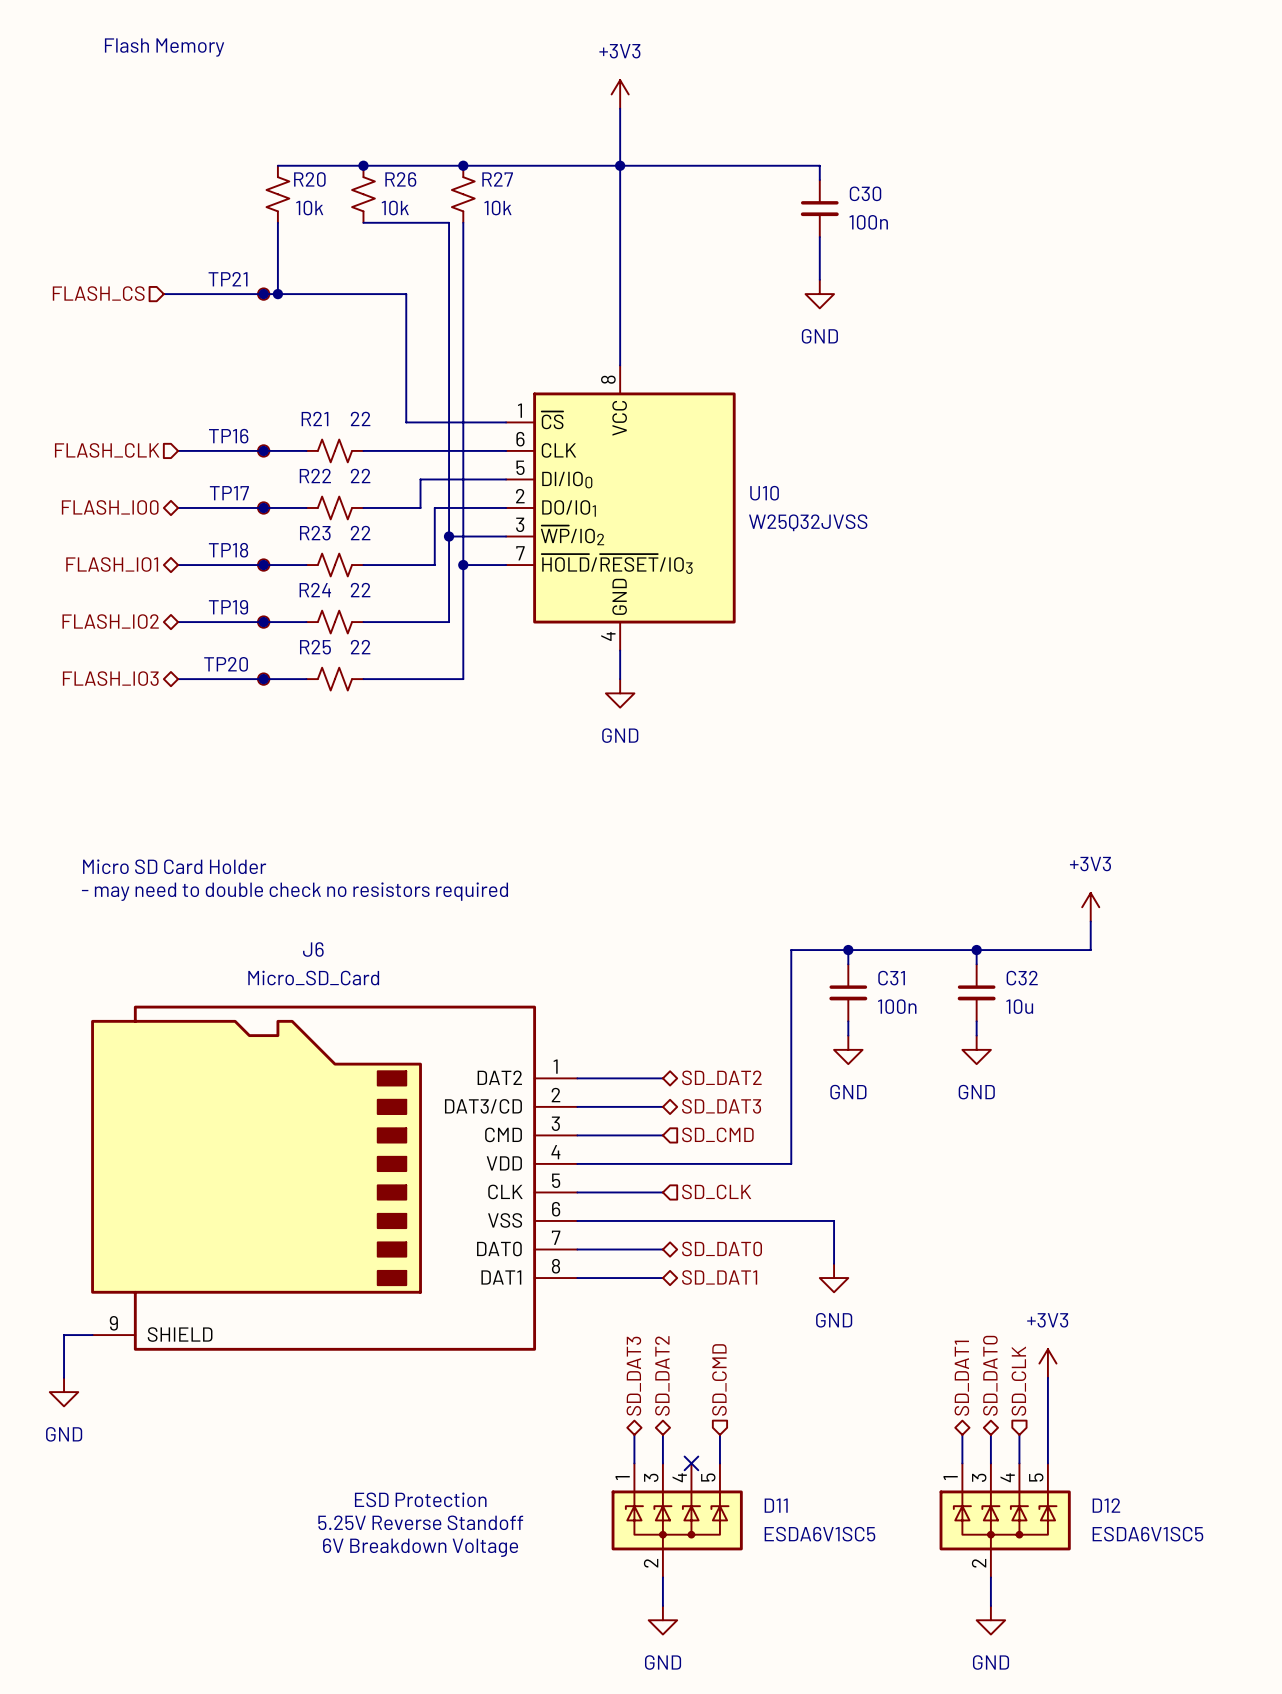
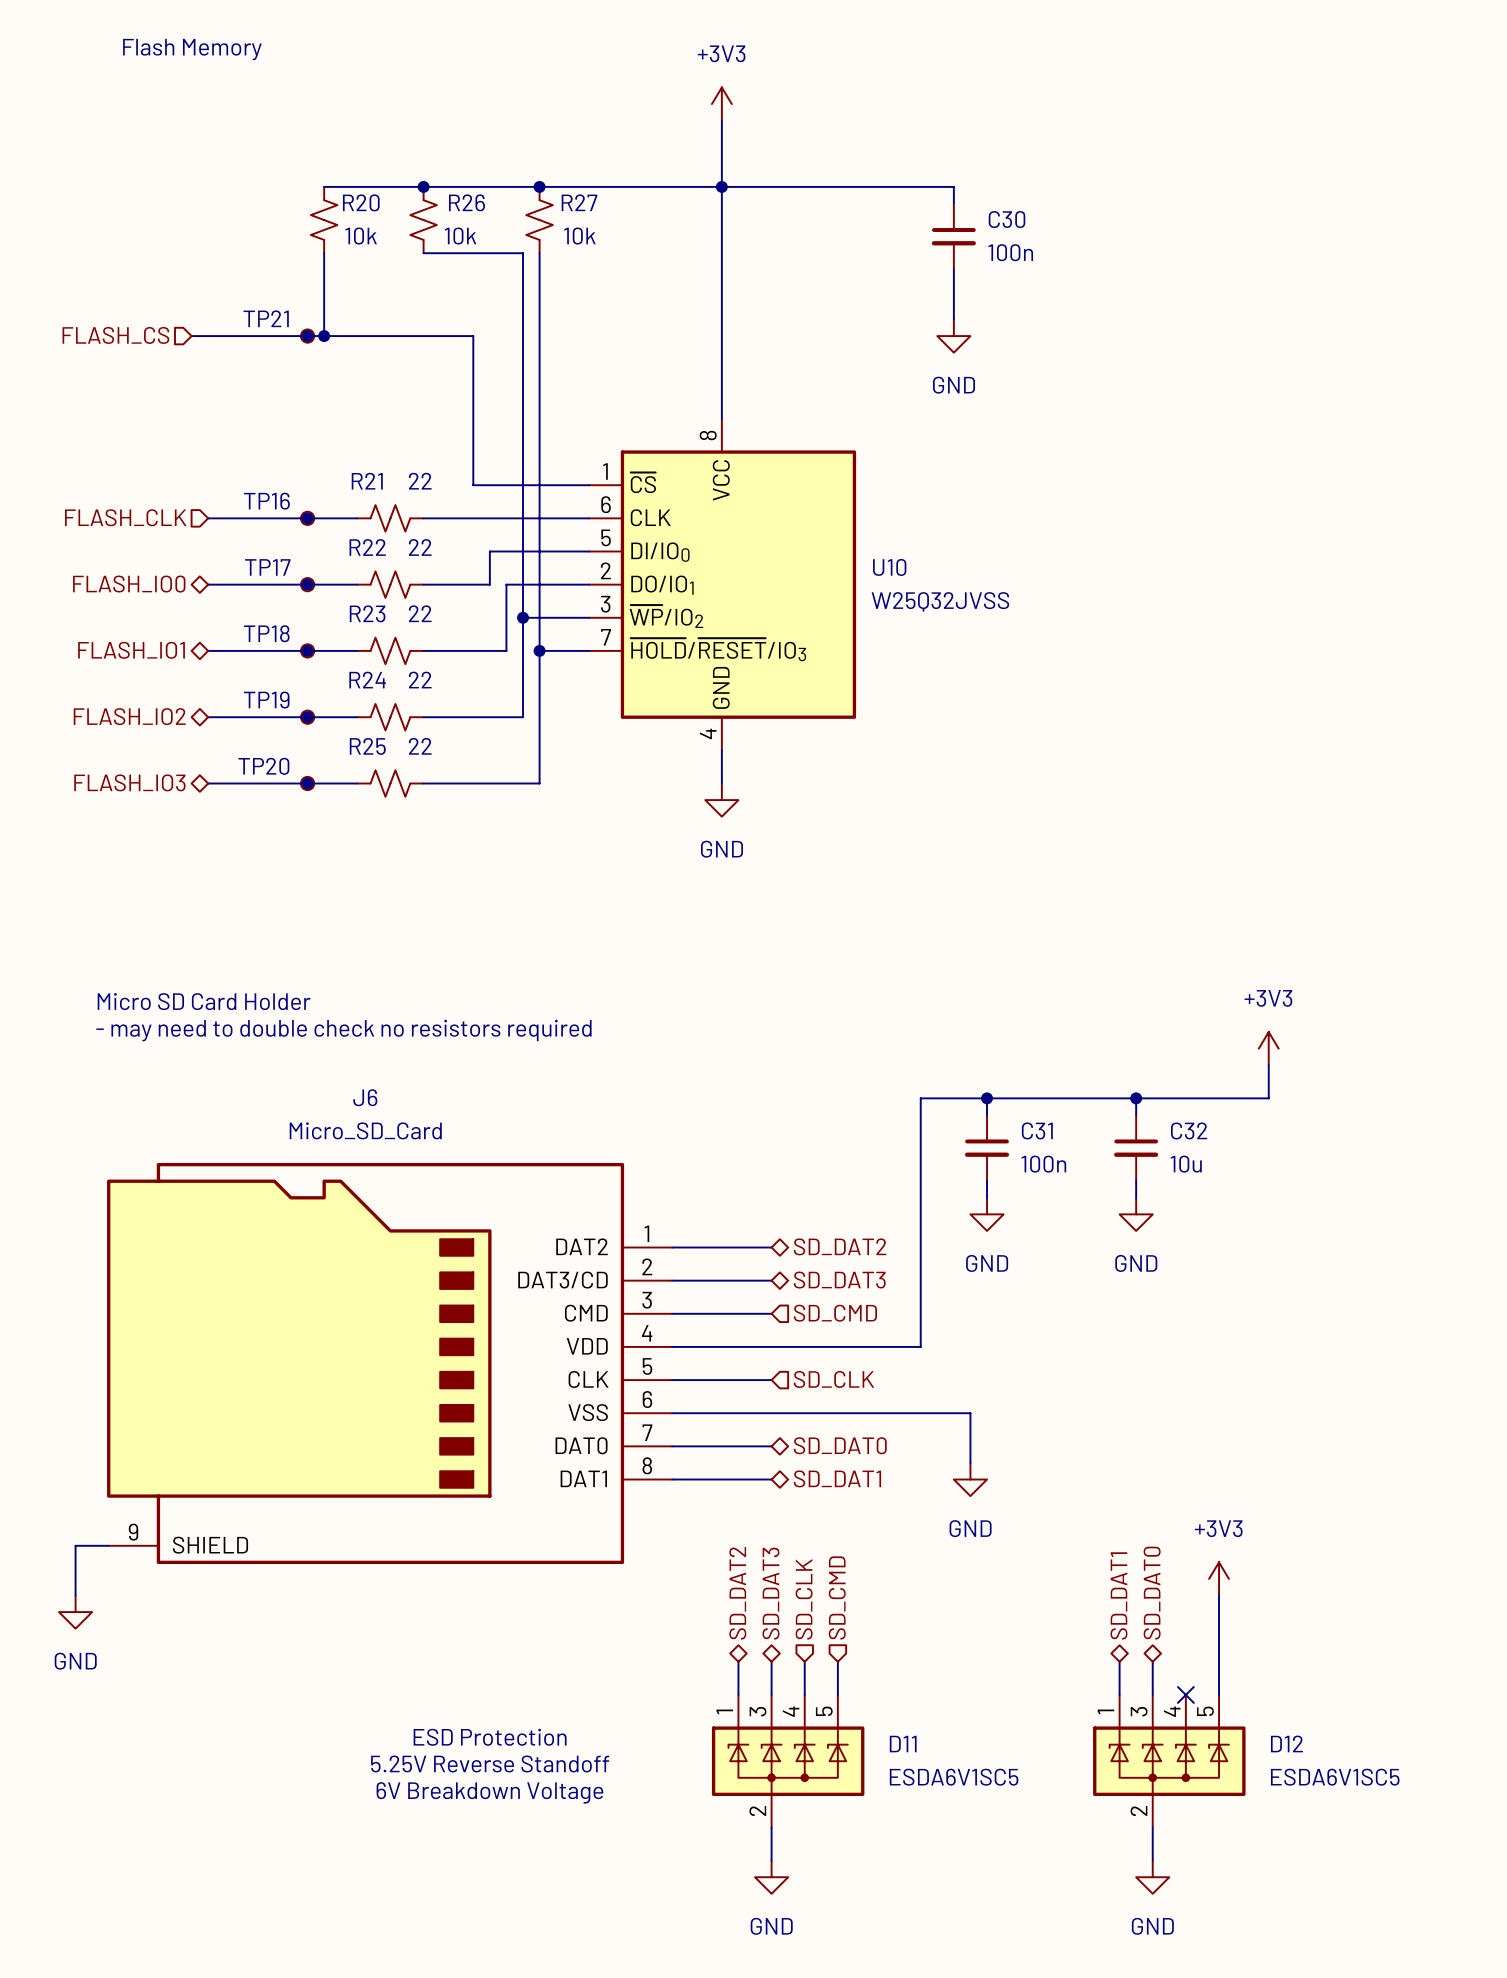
hierarchical label: SD_DAT2 (662, 1375) -> SD_DAT3 (770, 1593)
hierarchical label: SD_DAT3 (633, 1376) -> SD_DAT2 (737, 1593)
hierarchical label: none -> SD_CLK (804, 1599)
hierarchical label: SD_CLK (1018, 1381) -> none
wire: none -> (804, 1661) (804, 1694)
wire: (1019, 1434) (1019, 1463) -> none
no-connect mark: (691, 1463) -> none
no-connect mark: none -> (1185, 1694)

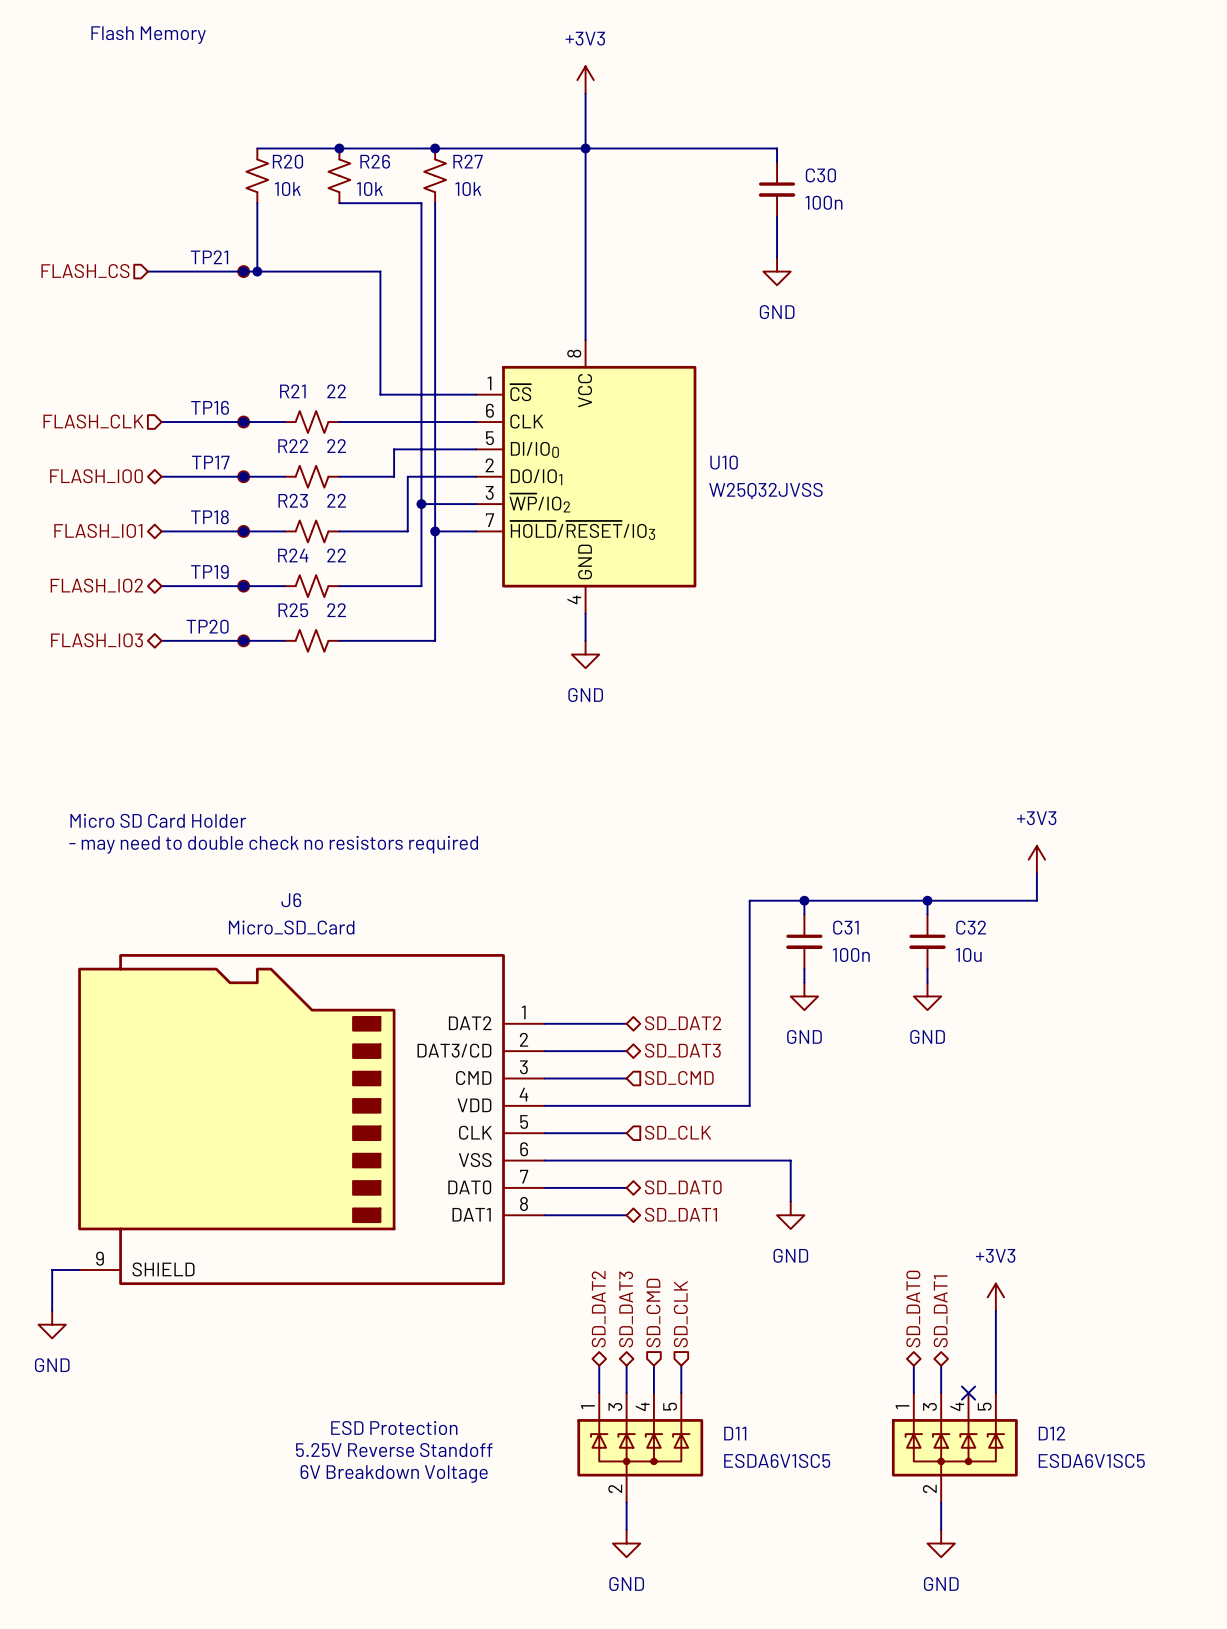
hierarchical label: SD_DAT0 (1152, 1593) -> SD_DAT1 (940, 1311)
hierarchical label: SD_DAT1 (1118, 1595) -> SD_DAT0 (913, 1309)
hierarchical label: SD_CMD (837, 1597) -> SD_CLK (680, 1314)
hierarchical label: SD_CLK (804, 1599) -> SD_CMD (653, 1313)

